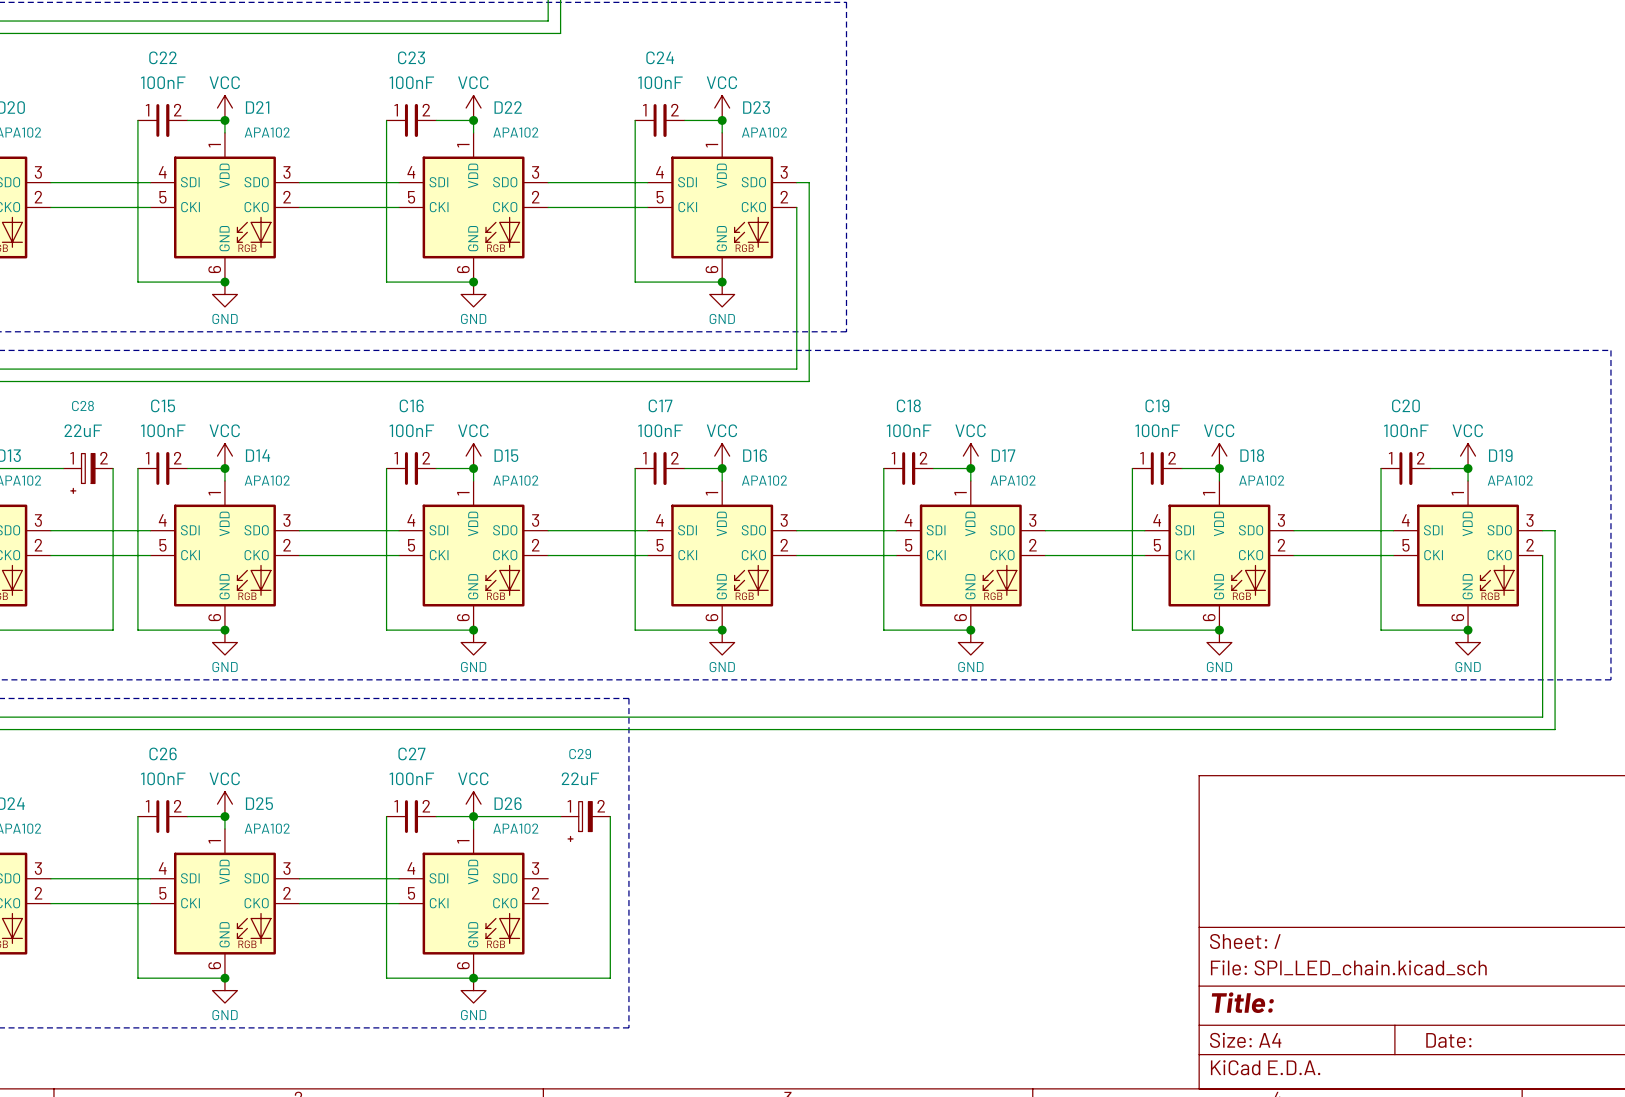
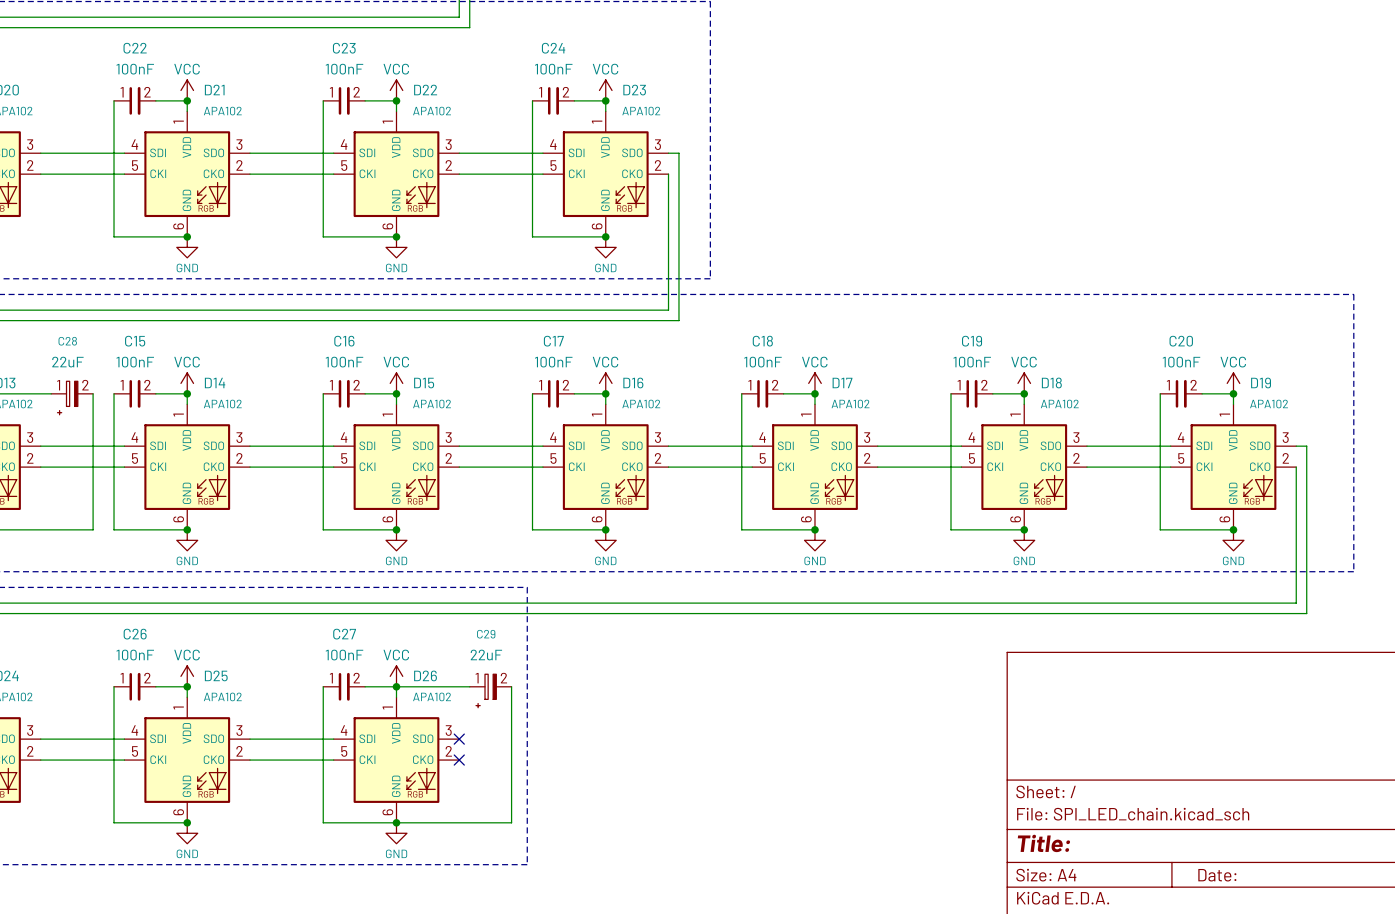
no-connect mark: none -> (459, 739)
no-connect mark: none -> (459, 760)

